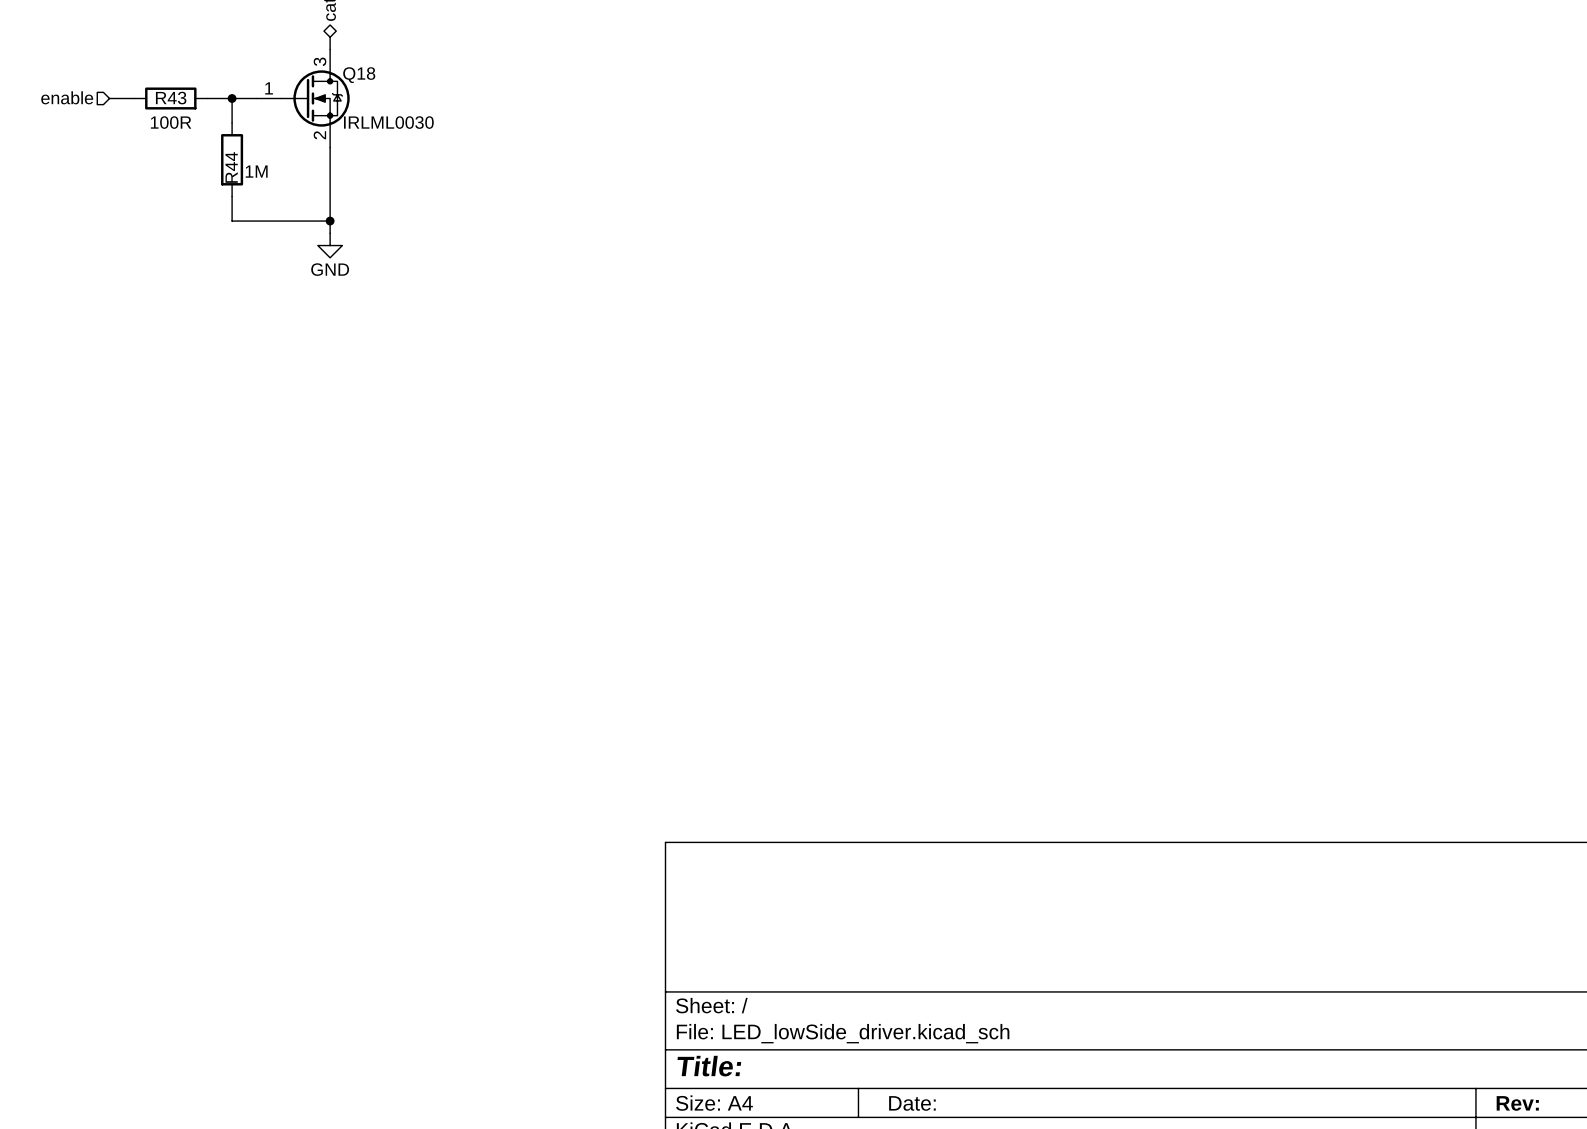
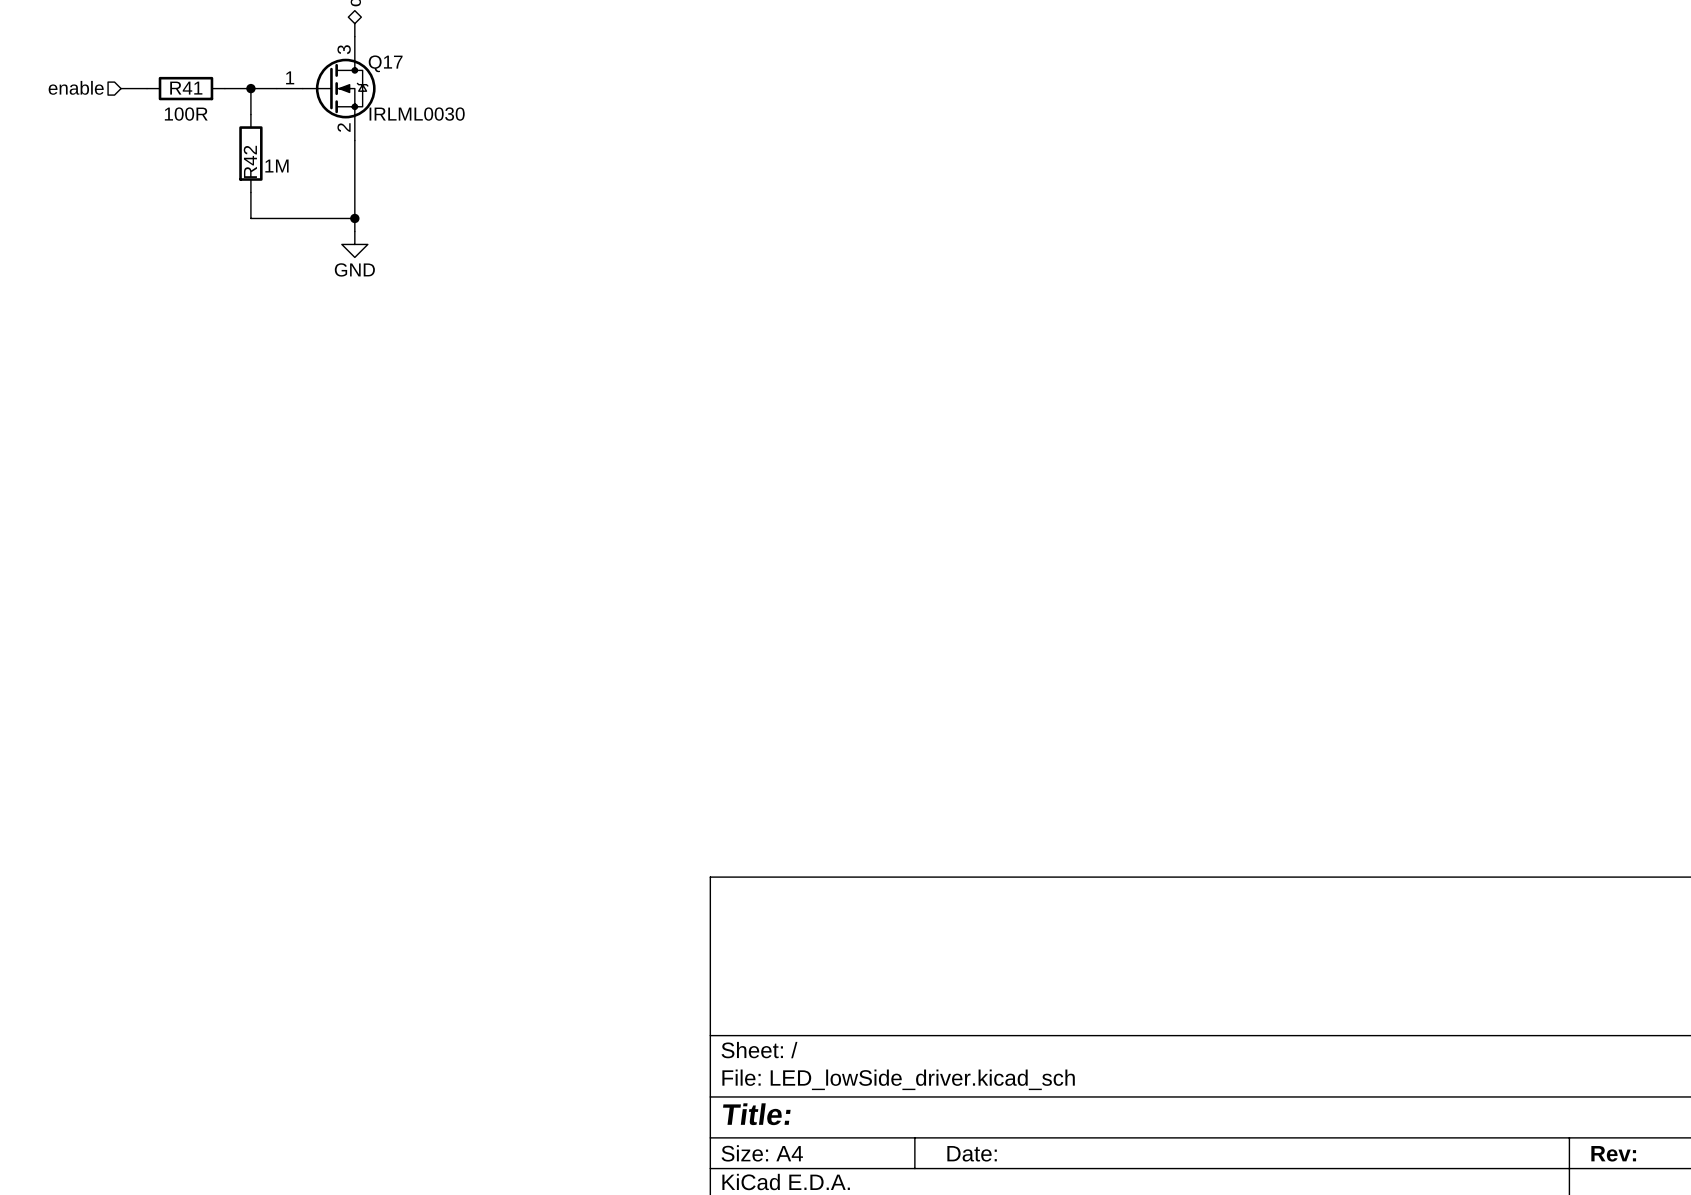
Q18 name: Q18 (359, 75) -> Q17 (385, 63)
R43 name: R43 (171, 98) -> R41 (186, 88)
R44 name: R44 (231, 167) -> R42 (250, 161)

